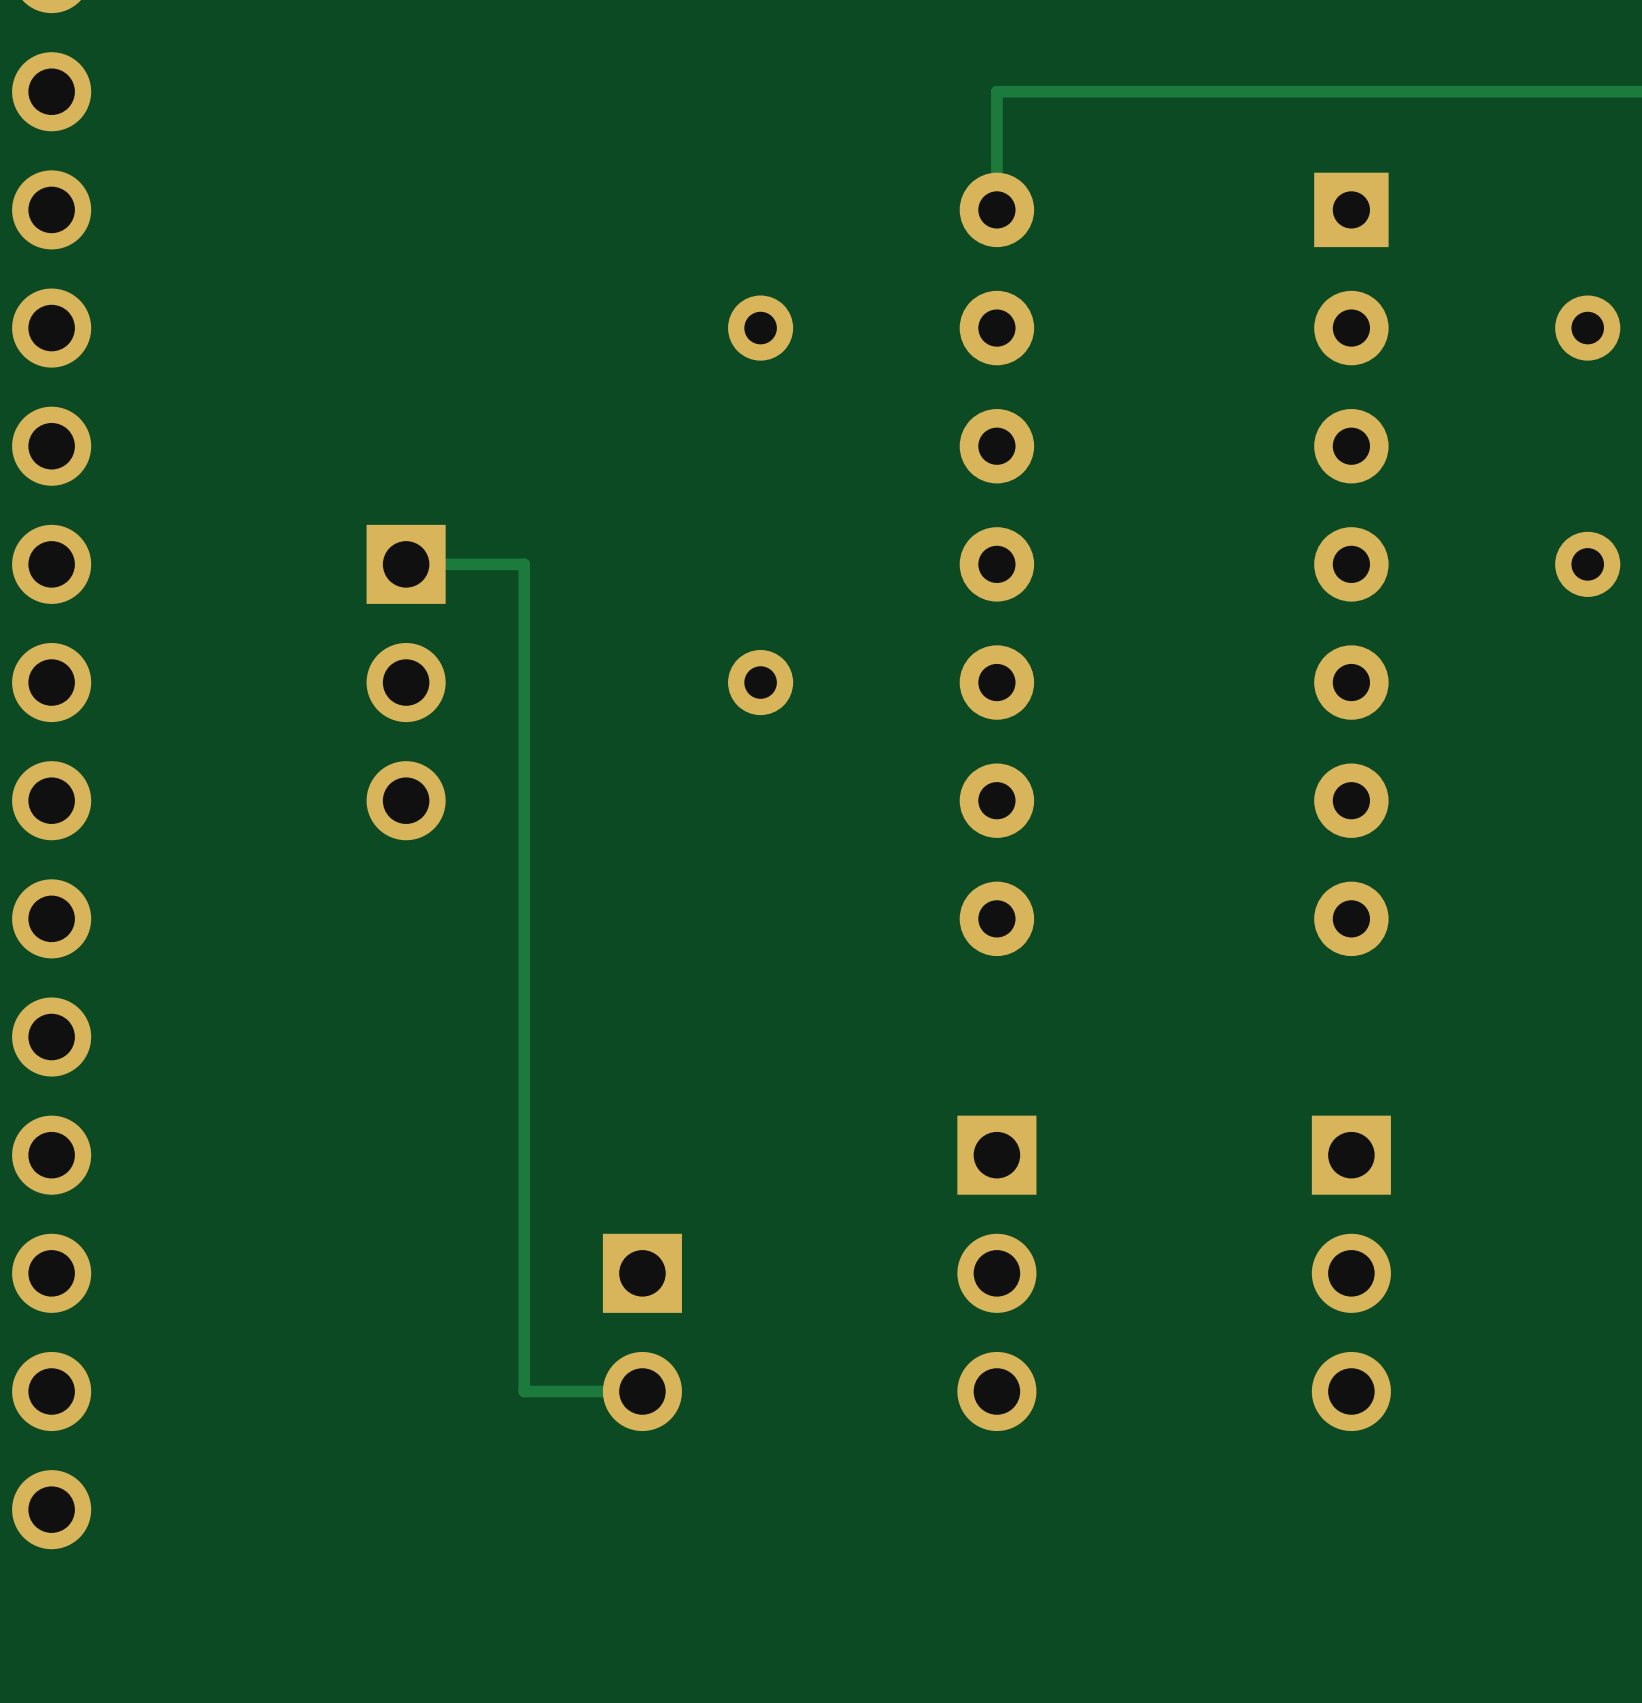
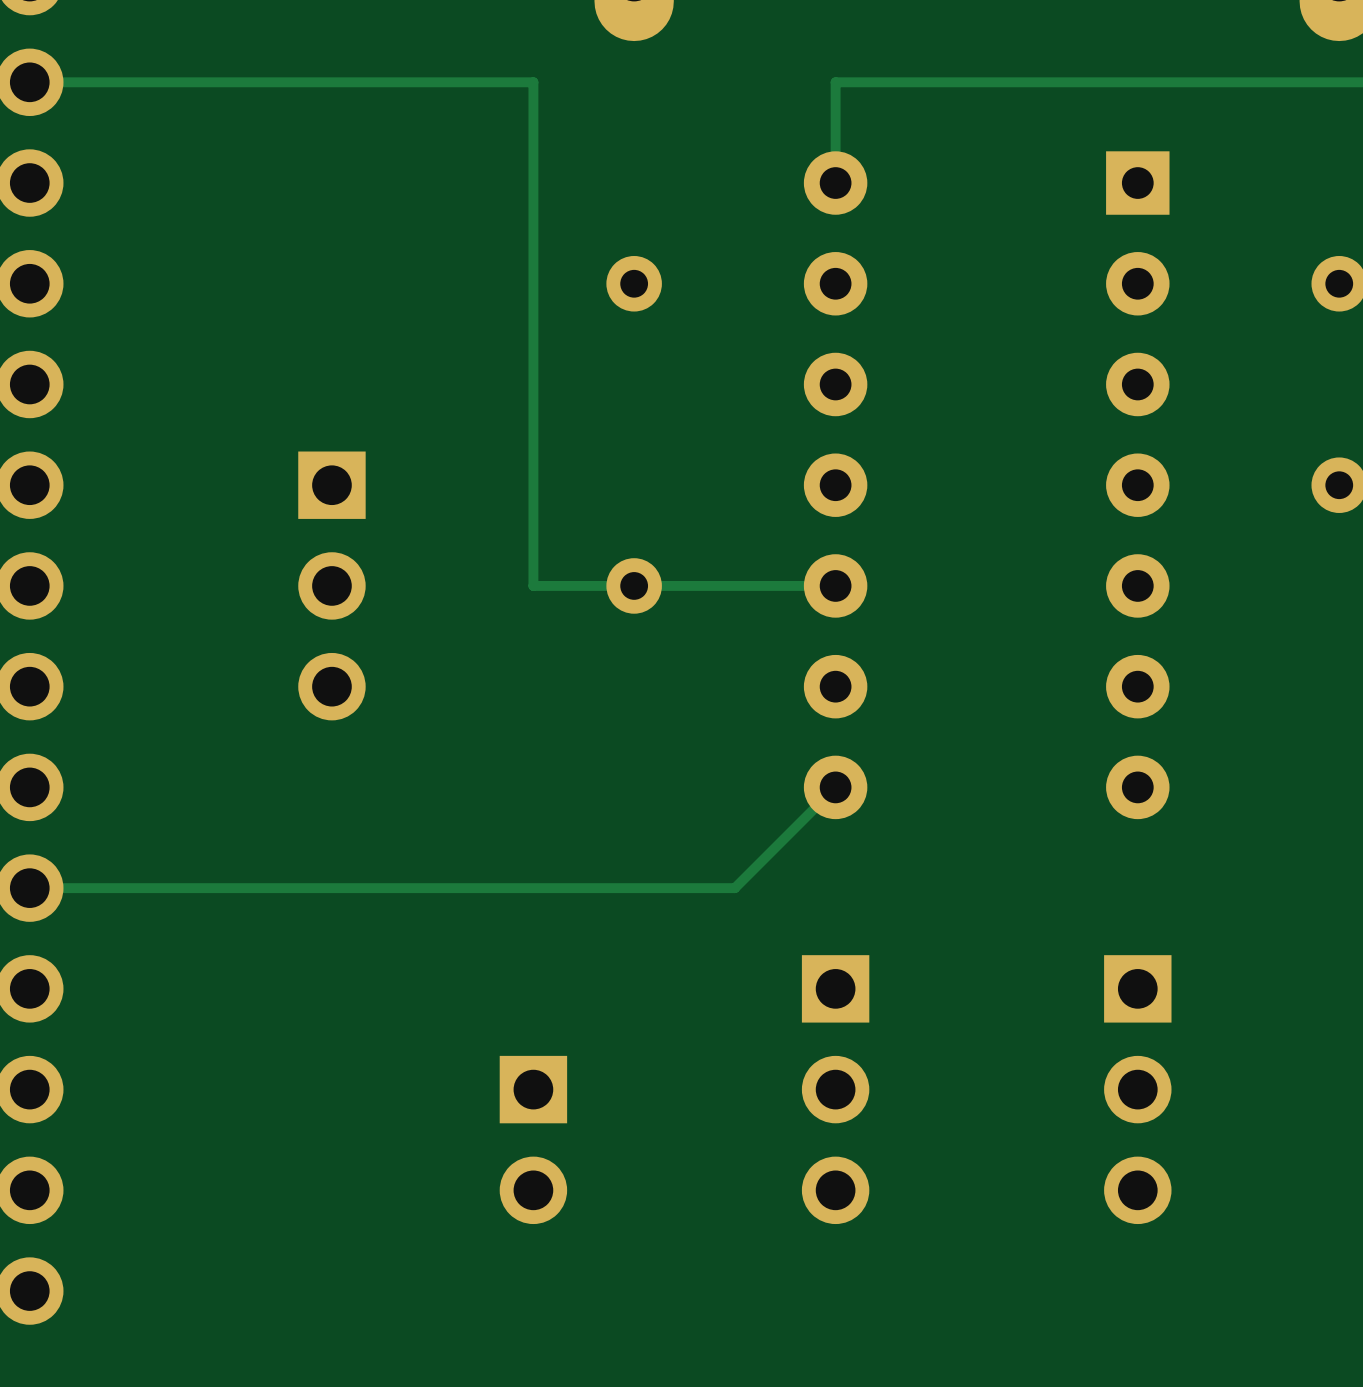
track: none -> (29, 82) (533, 82) (533, 585) (835, 585)
track: (406, 564) (524, 564) (524, 1391) (642, 1391) -> none
track: none -> (835, 787) (734, 888) (29, 888)

